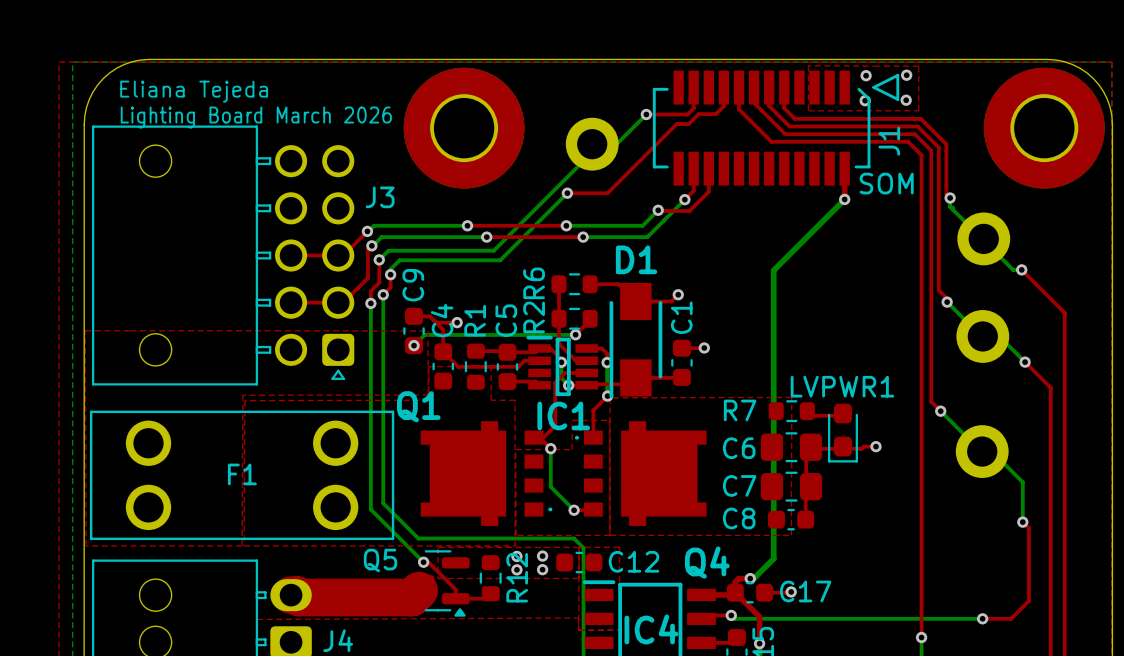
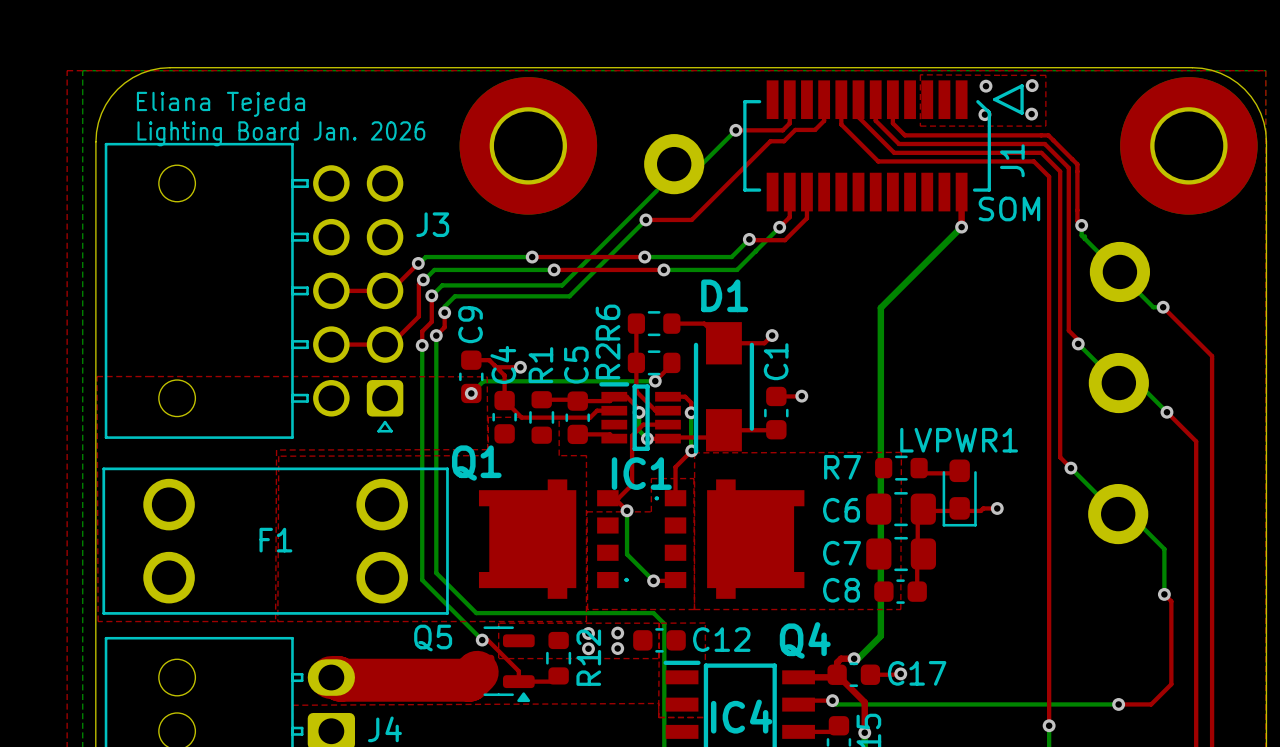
text: Lighting Board March 2026 (256, 117) -> Lighting Board Jan. 2026 (281, 133)

